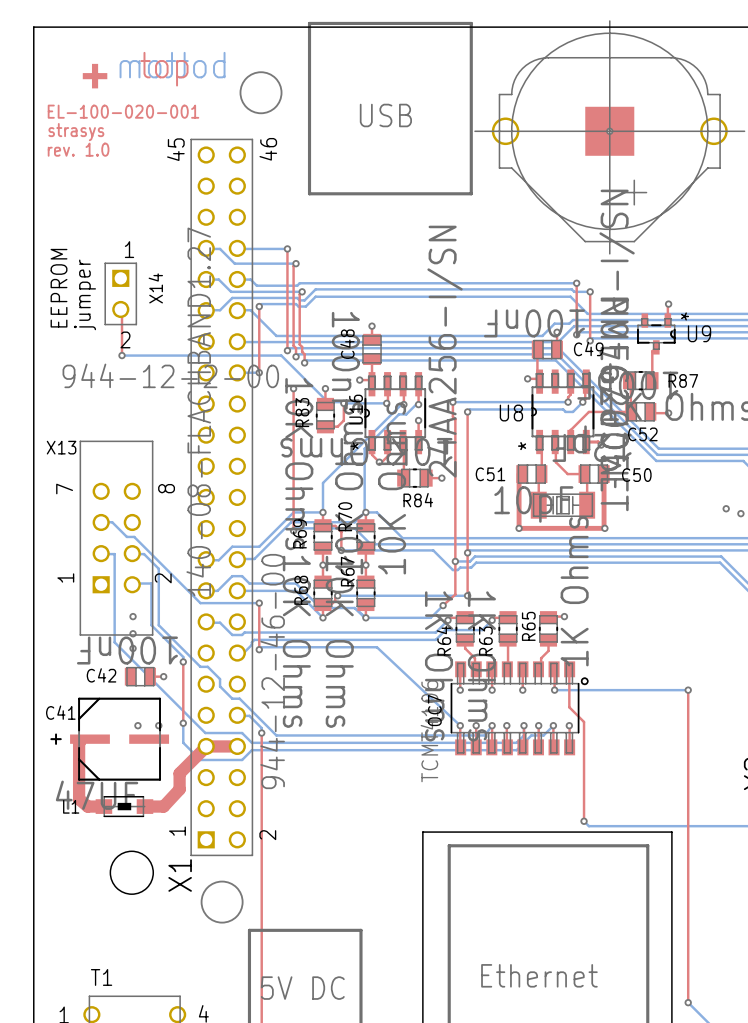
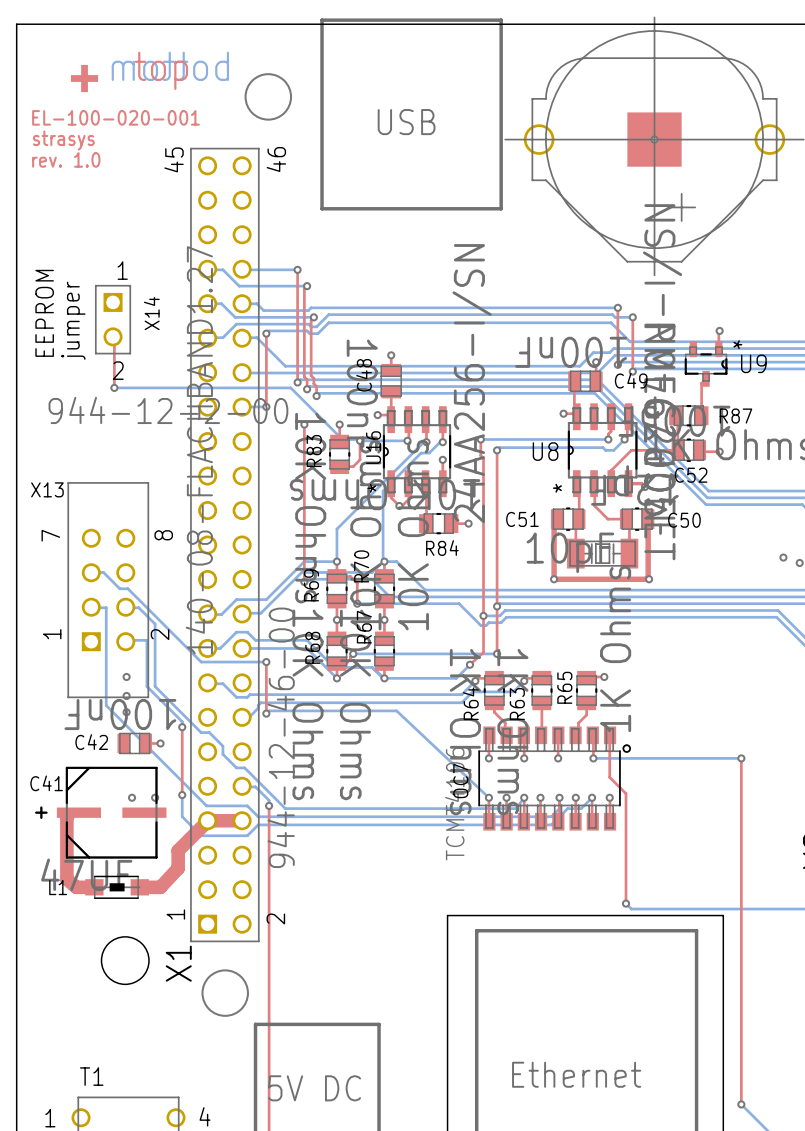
C52 footprint: [625, 402, 657, 421] -> [671, 438, 707, 462]
C51 footprint: [516, 465, 548, 484] -> [550, 507, 586, 531]
C50 footprint: [578, 465, 610, 484] -> [619, 507, 655, 531]

